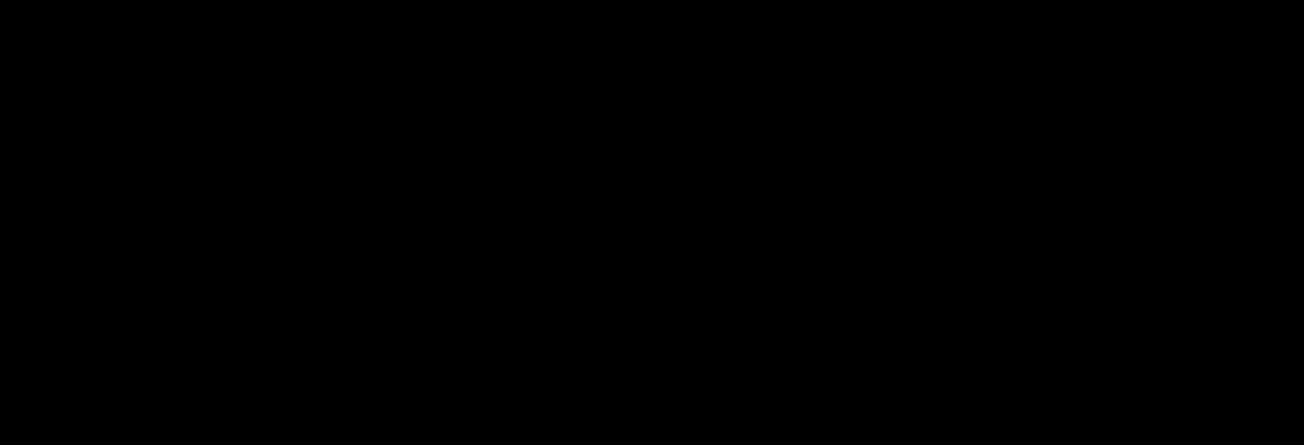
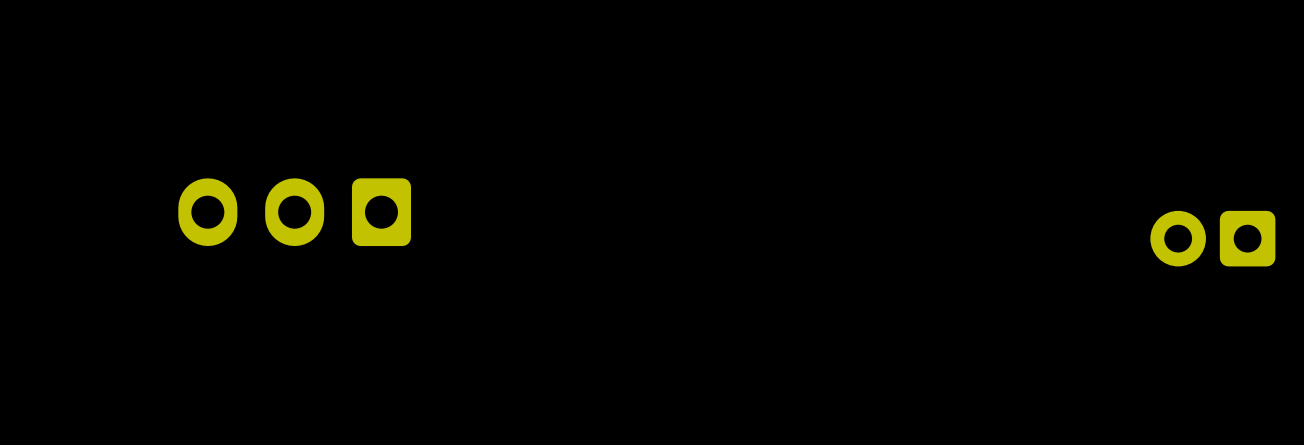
part: none -> (294, 212)
part: none -> (1212, 238)

